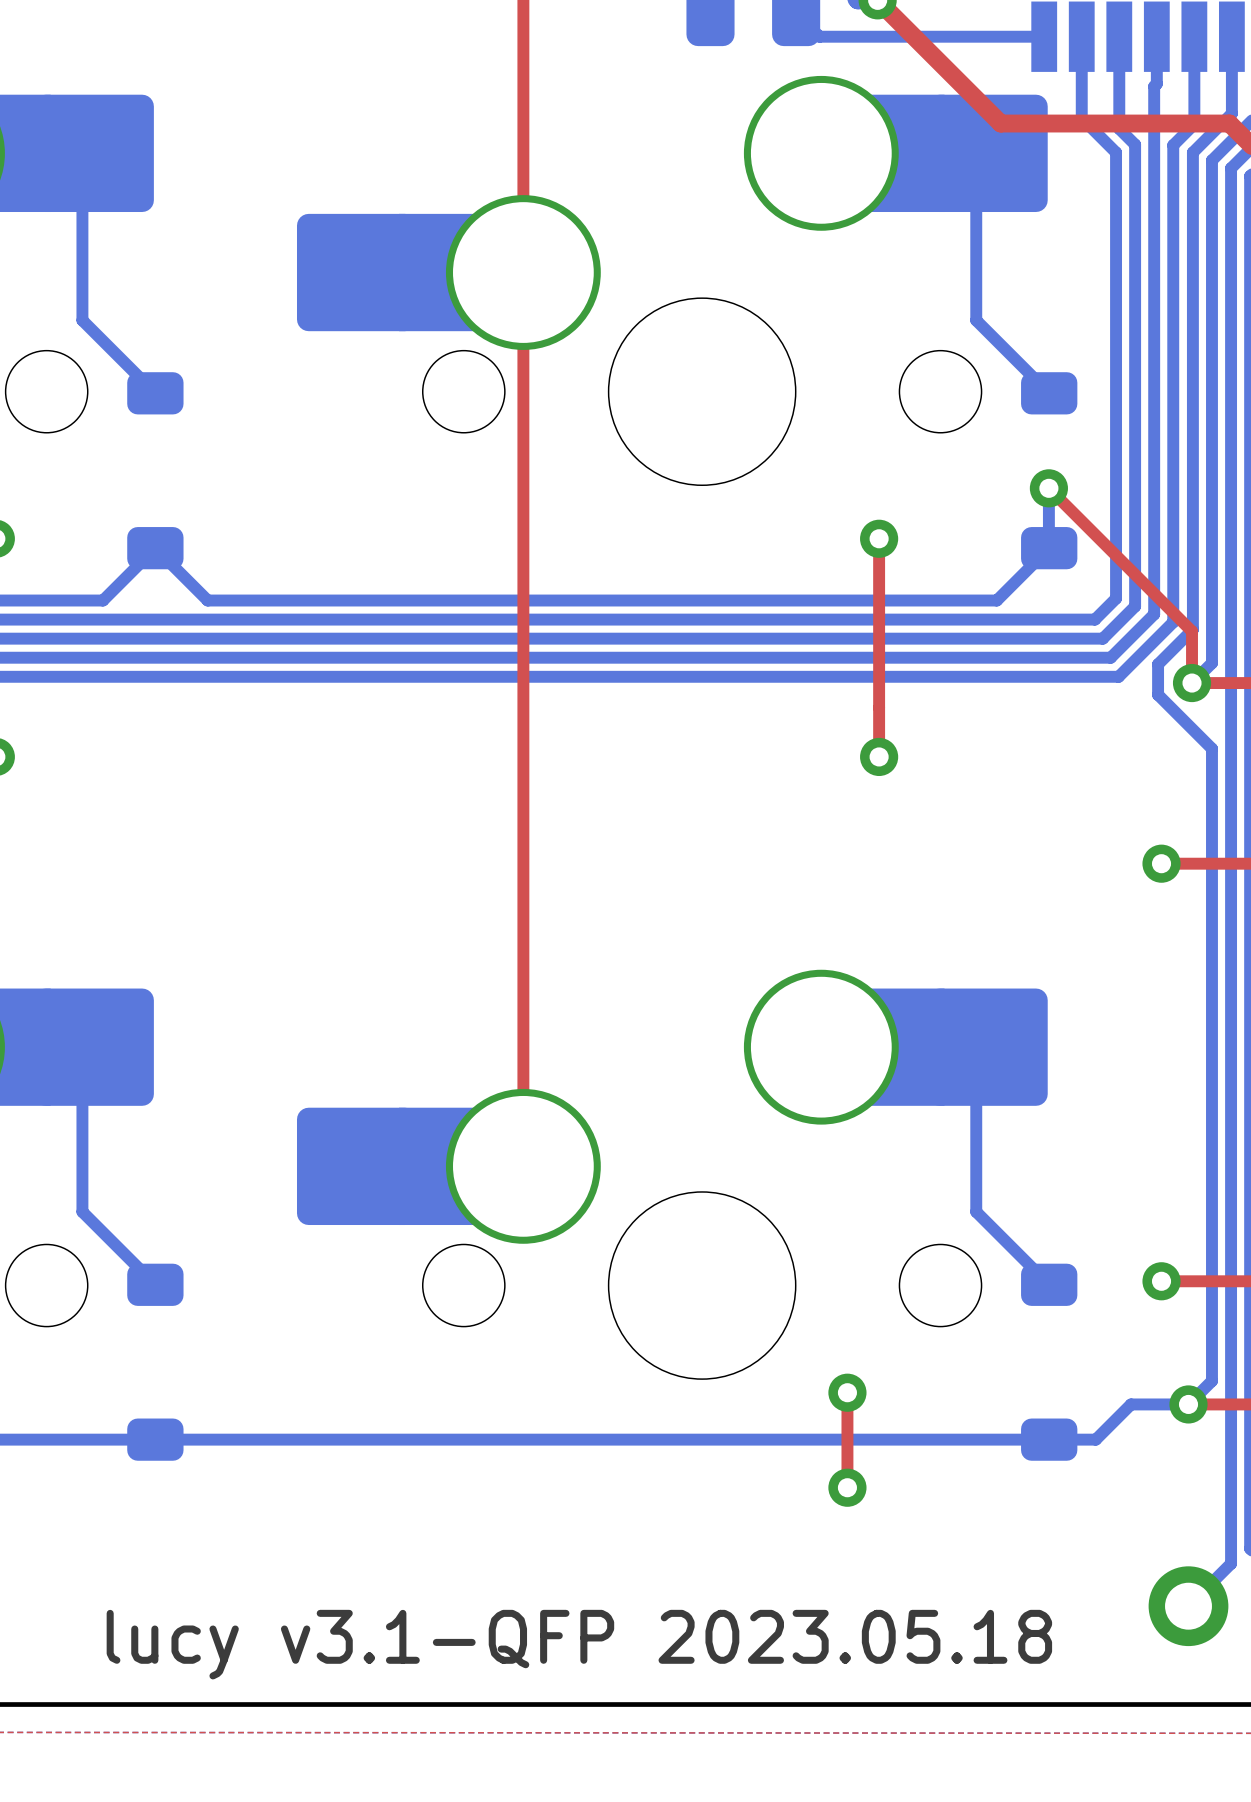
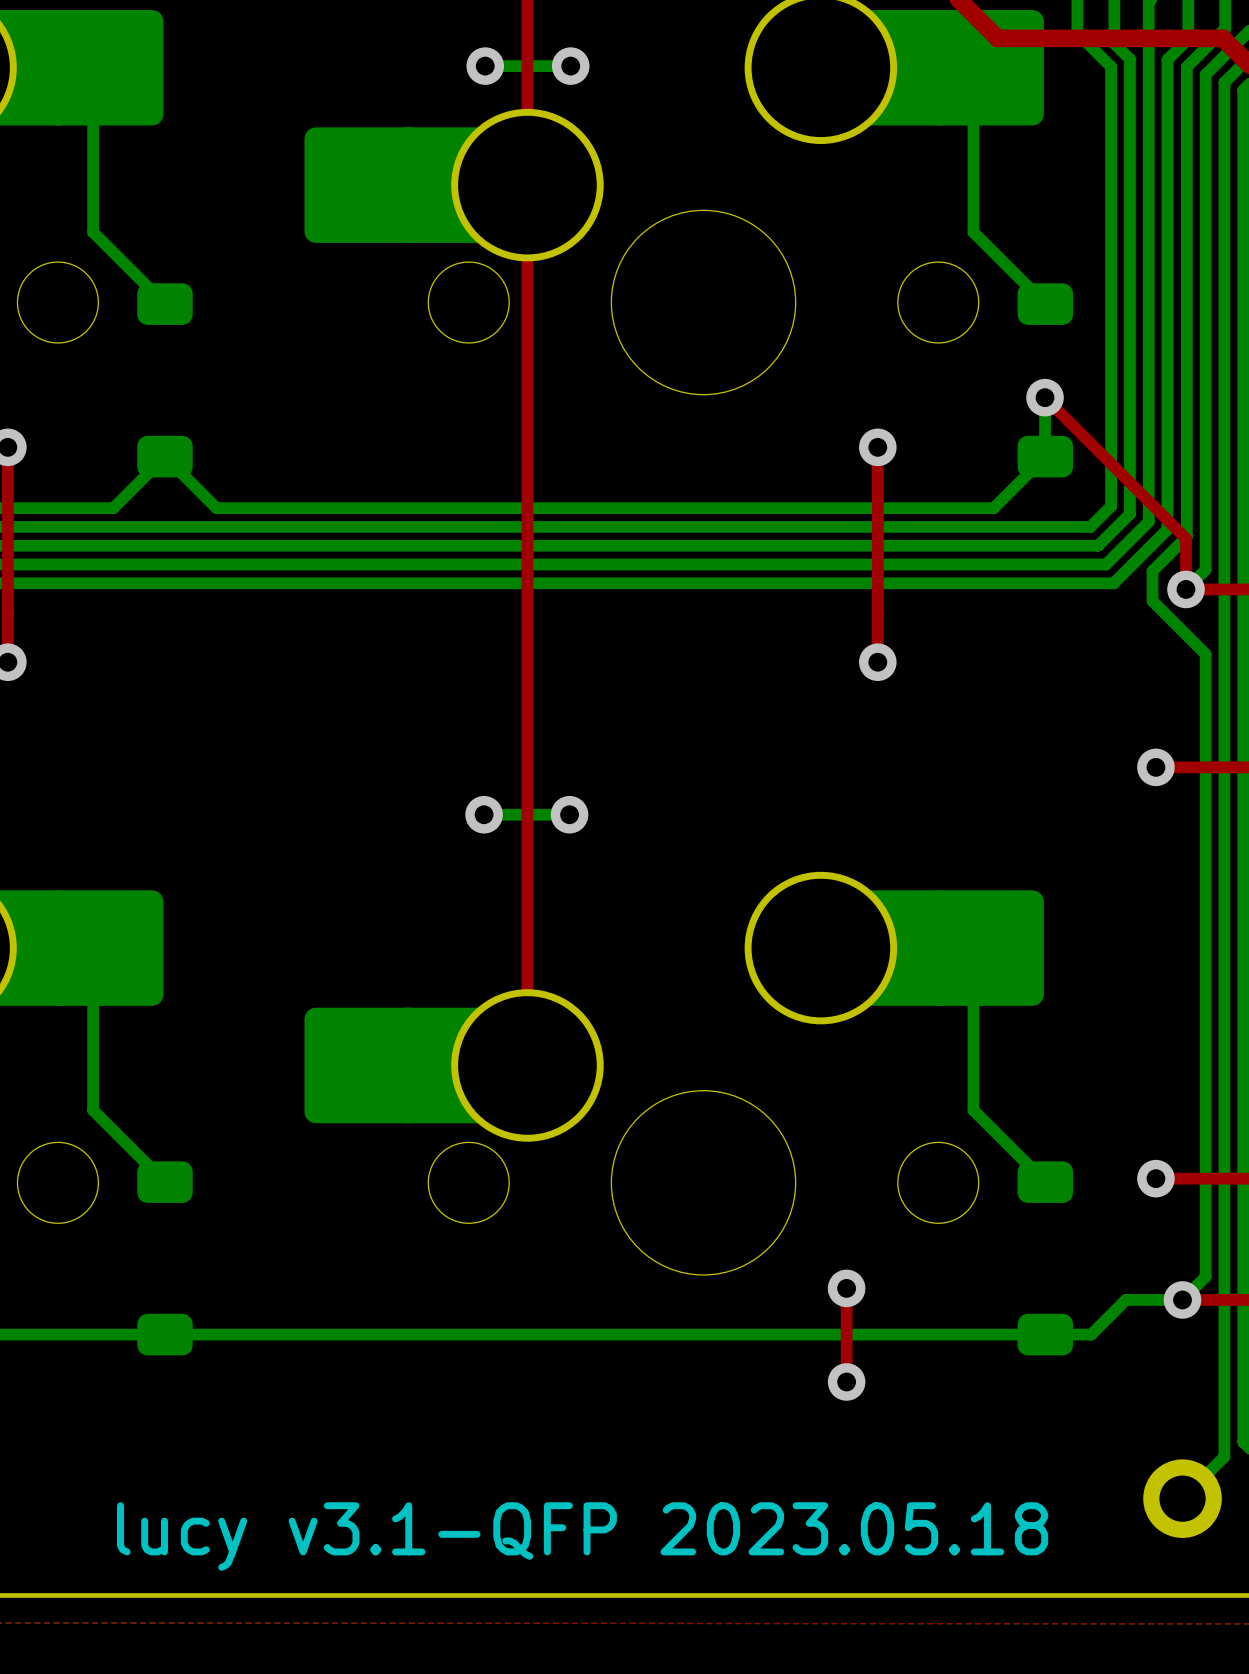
bottom track: none -> (485, 66) (570, 66)
via: none -> (485, 66)
via: none -> (570, 66)
bottom track: none -> (484, 814) (569, 814)
via: none -> (484, 814)
via: none -> (569, 814)

